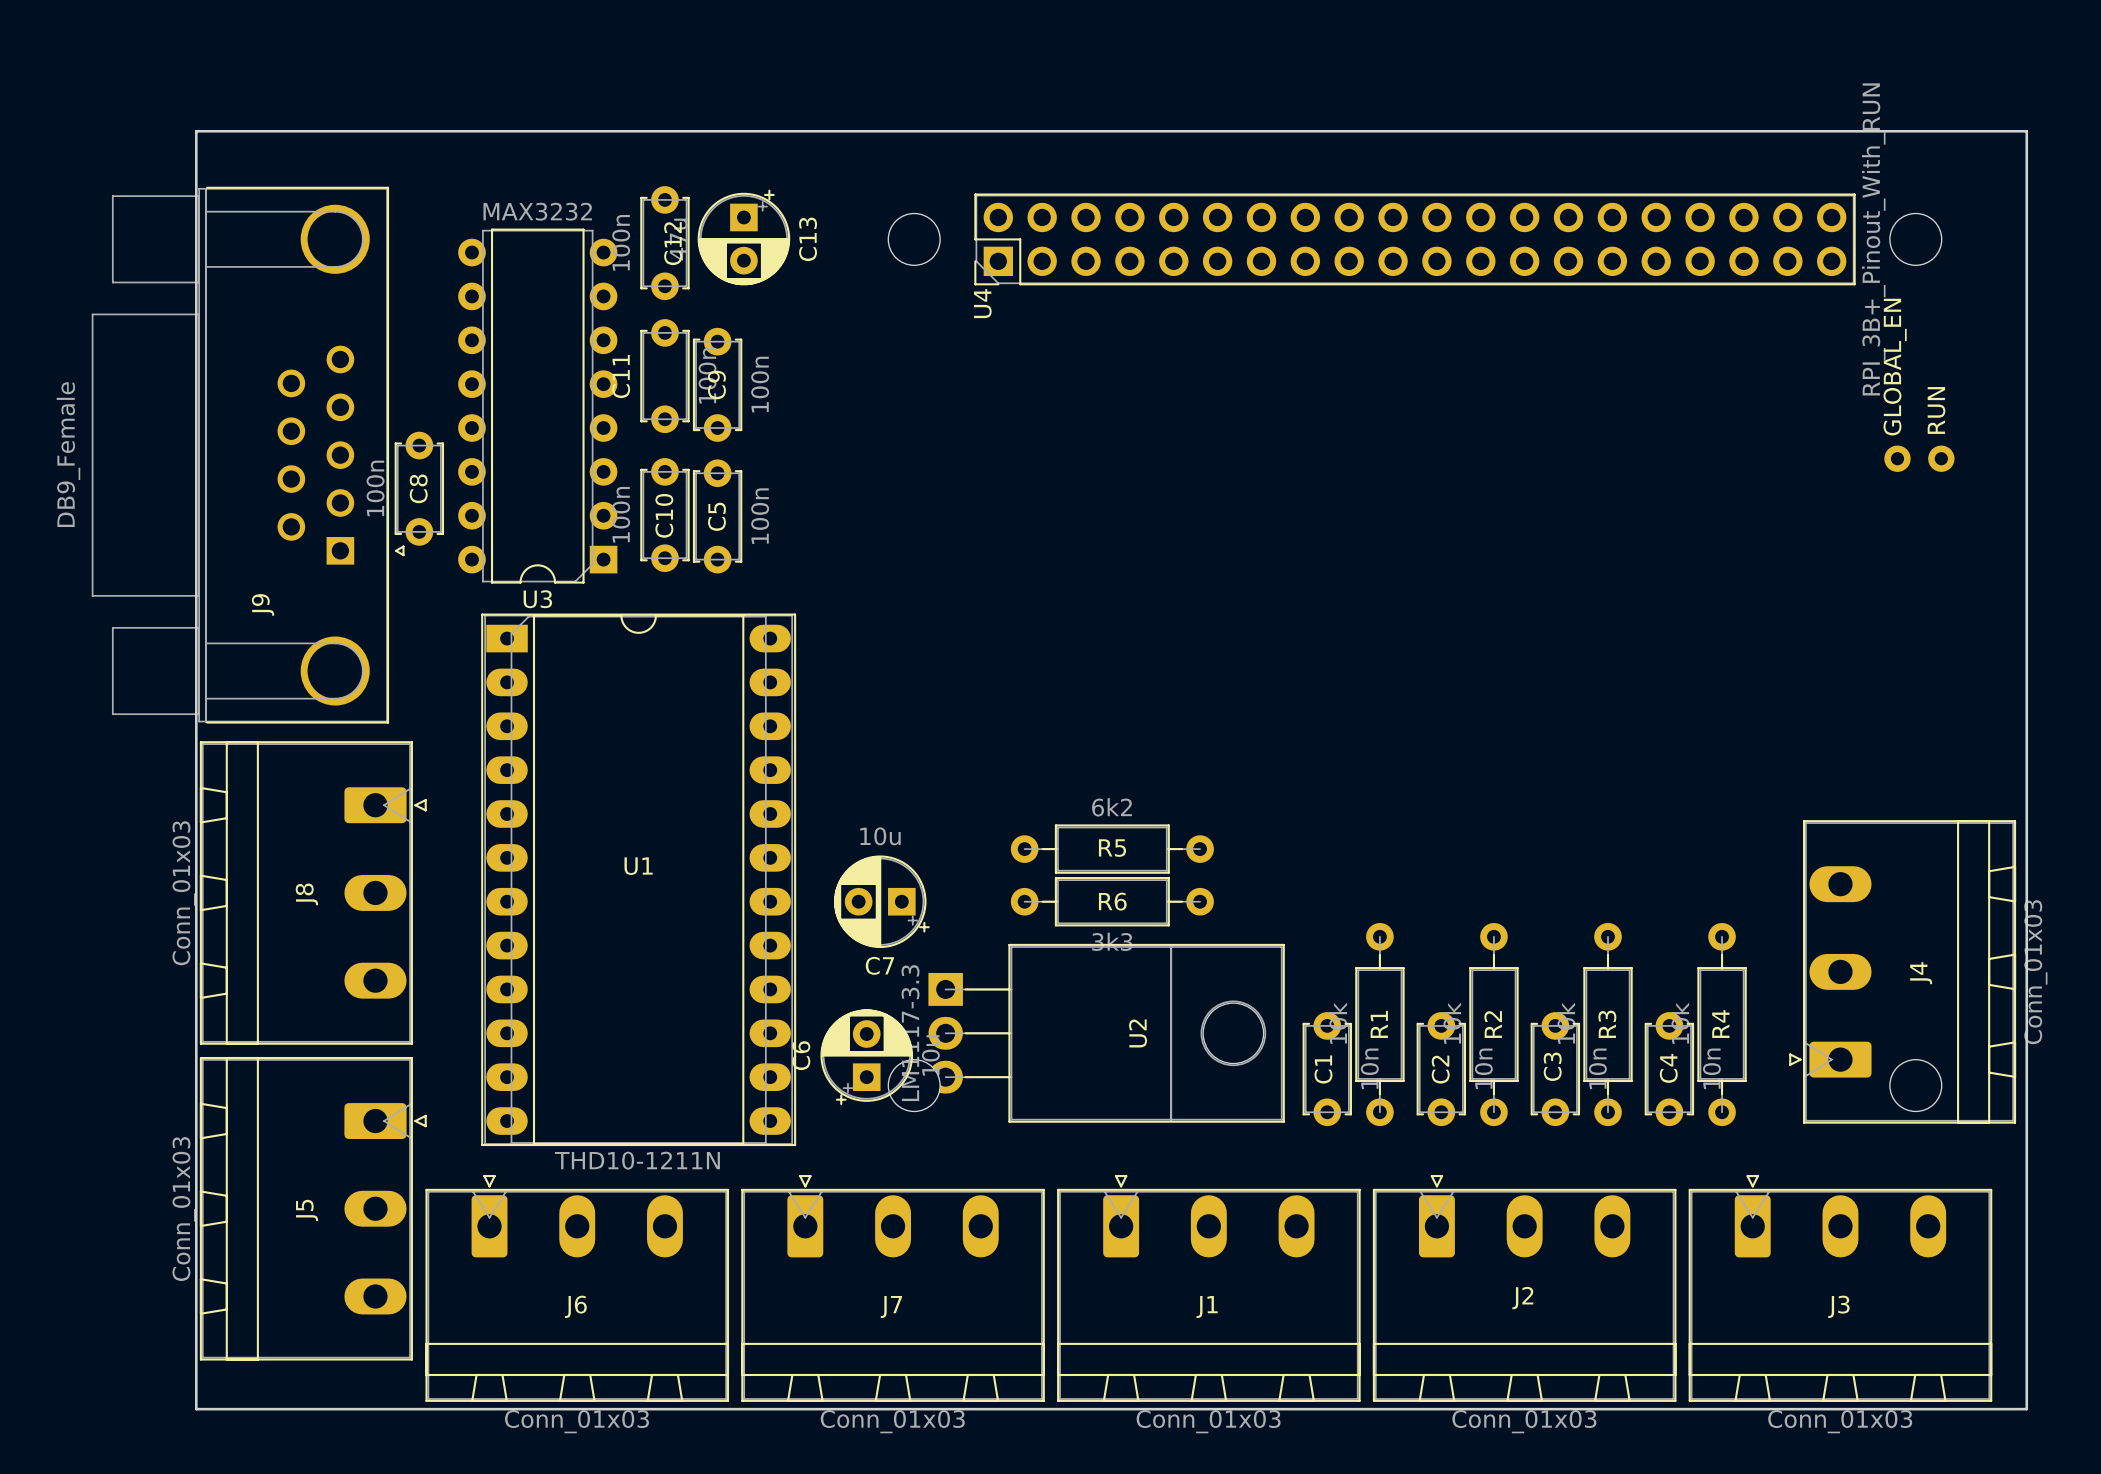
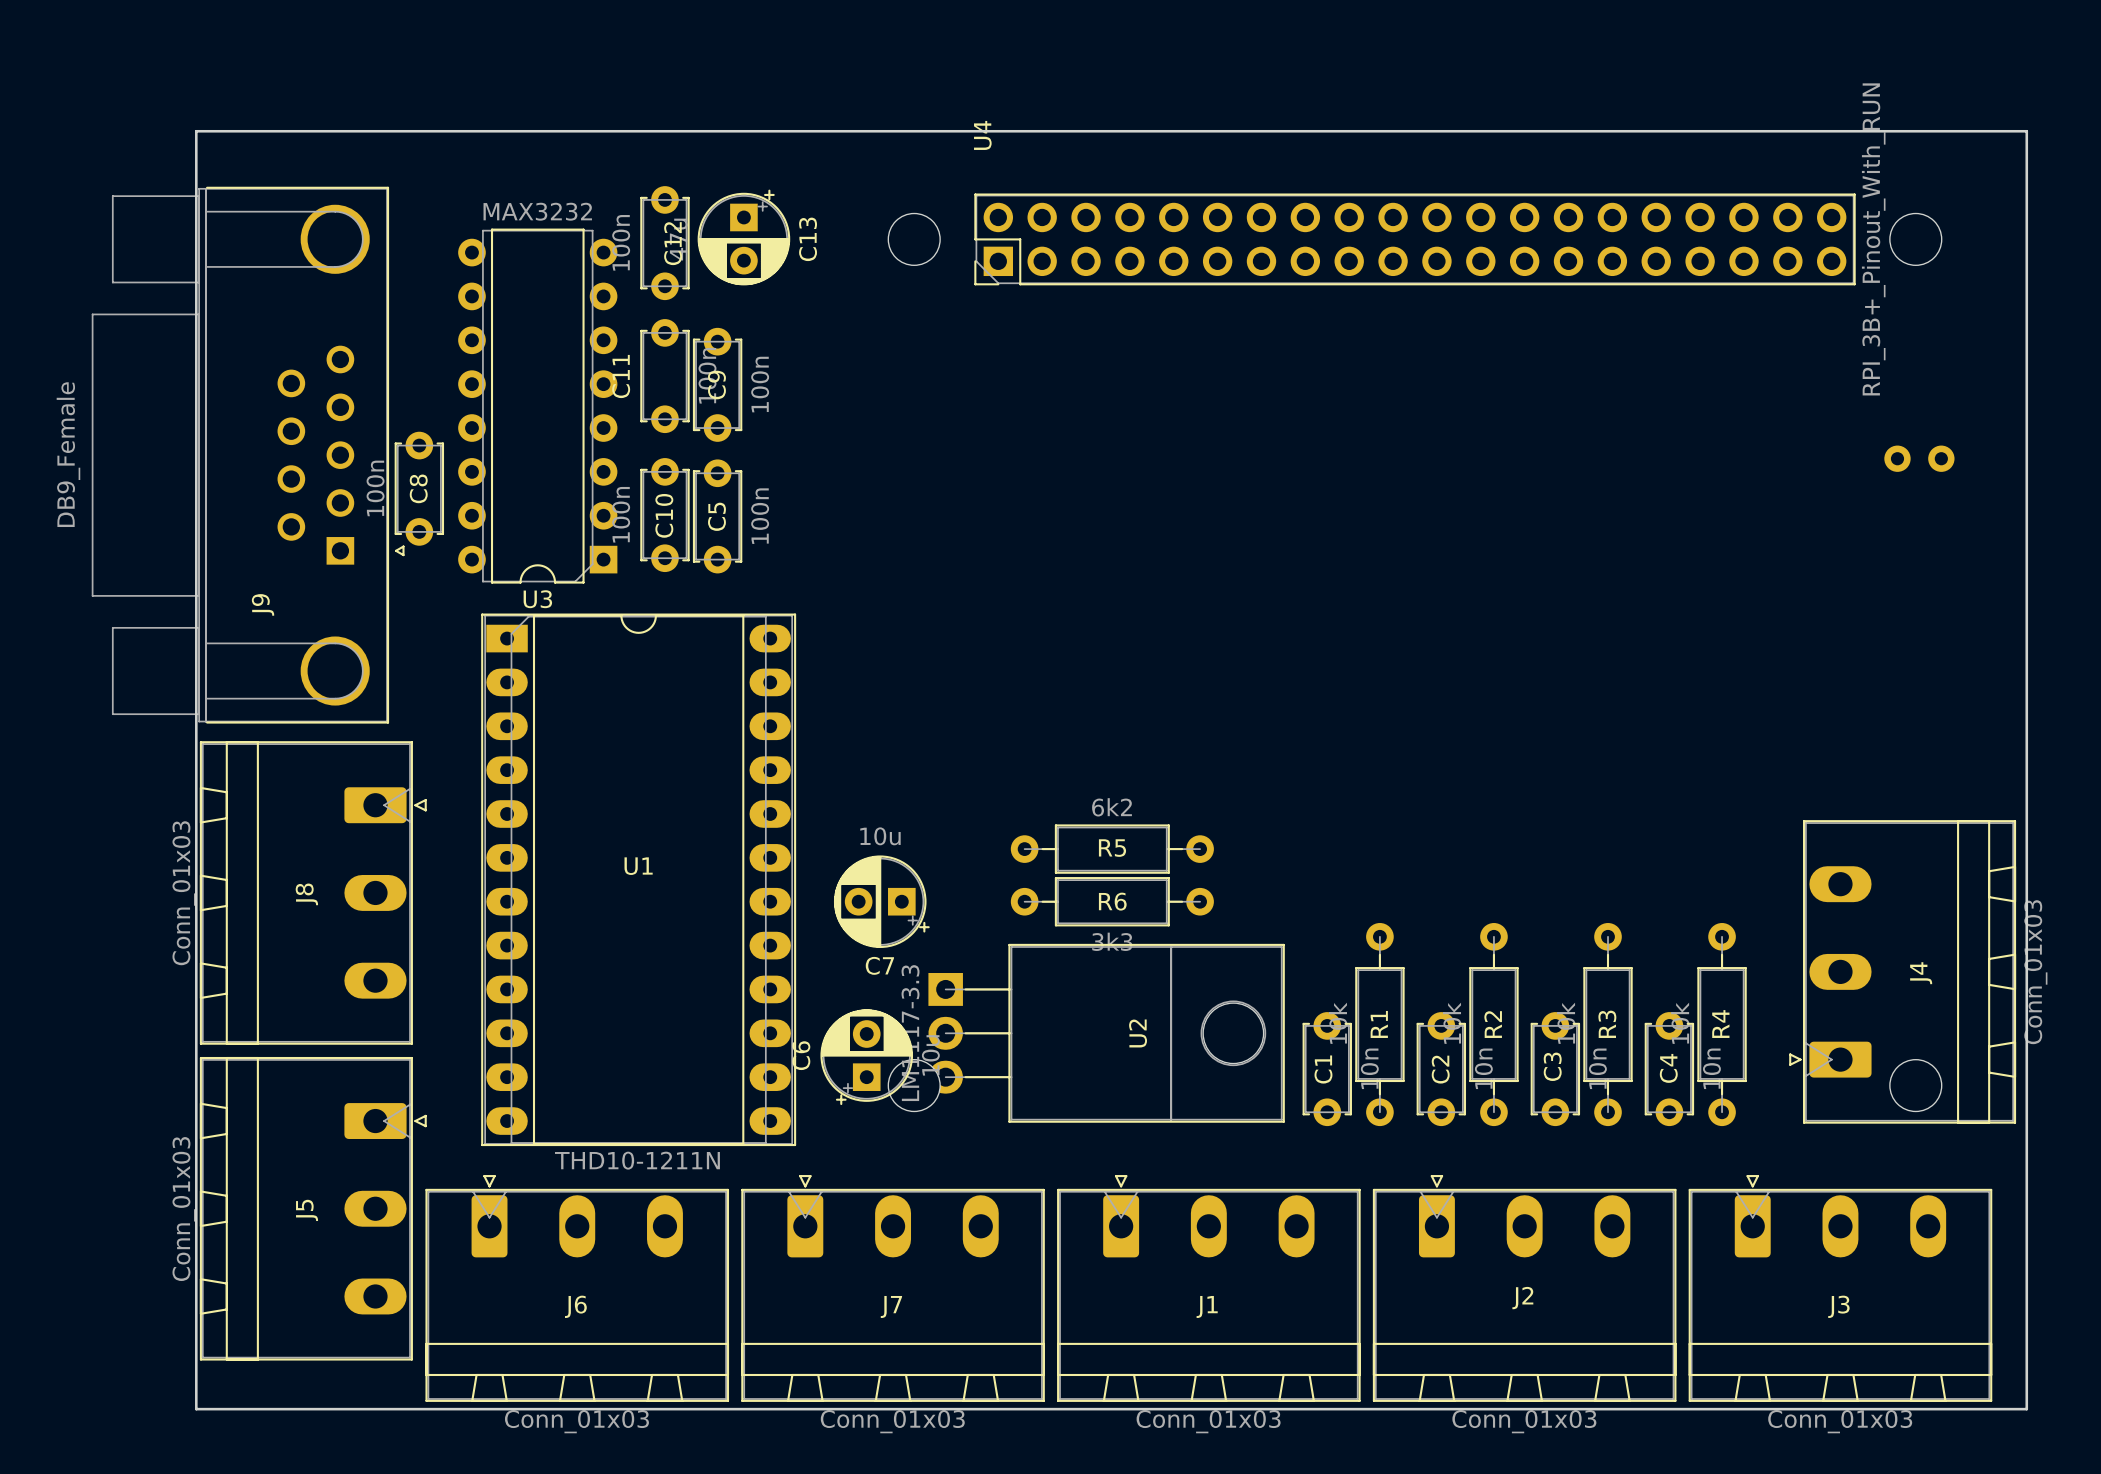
U4 name position: U4 (982, 303) -> U4 (982, 135)
U4 text: GLOBAL_EN (1895, 367) -> none
U4 text: RUN (1936, 410) -> none

